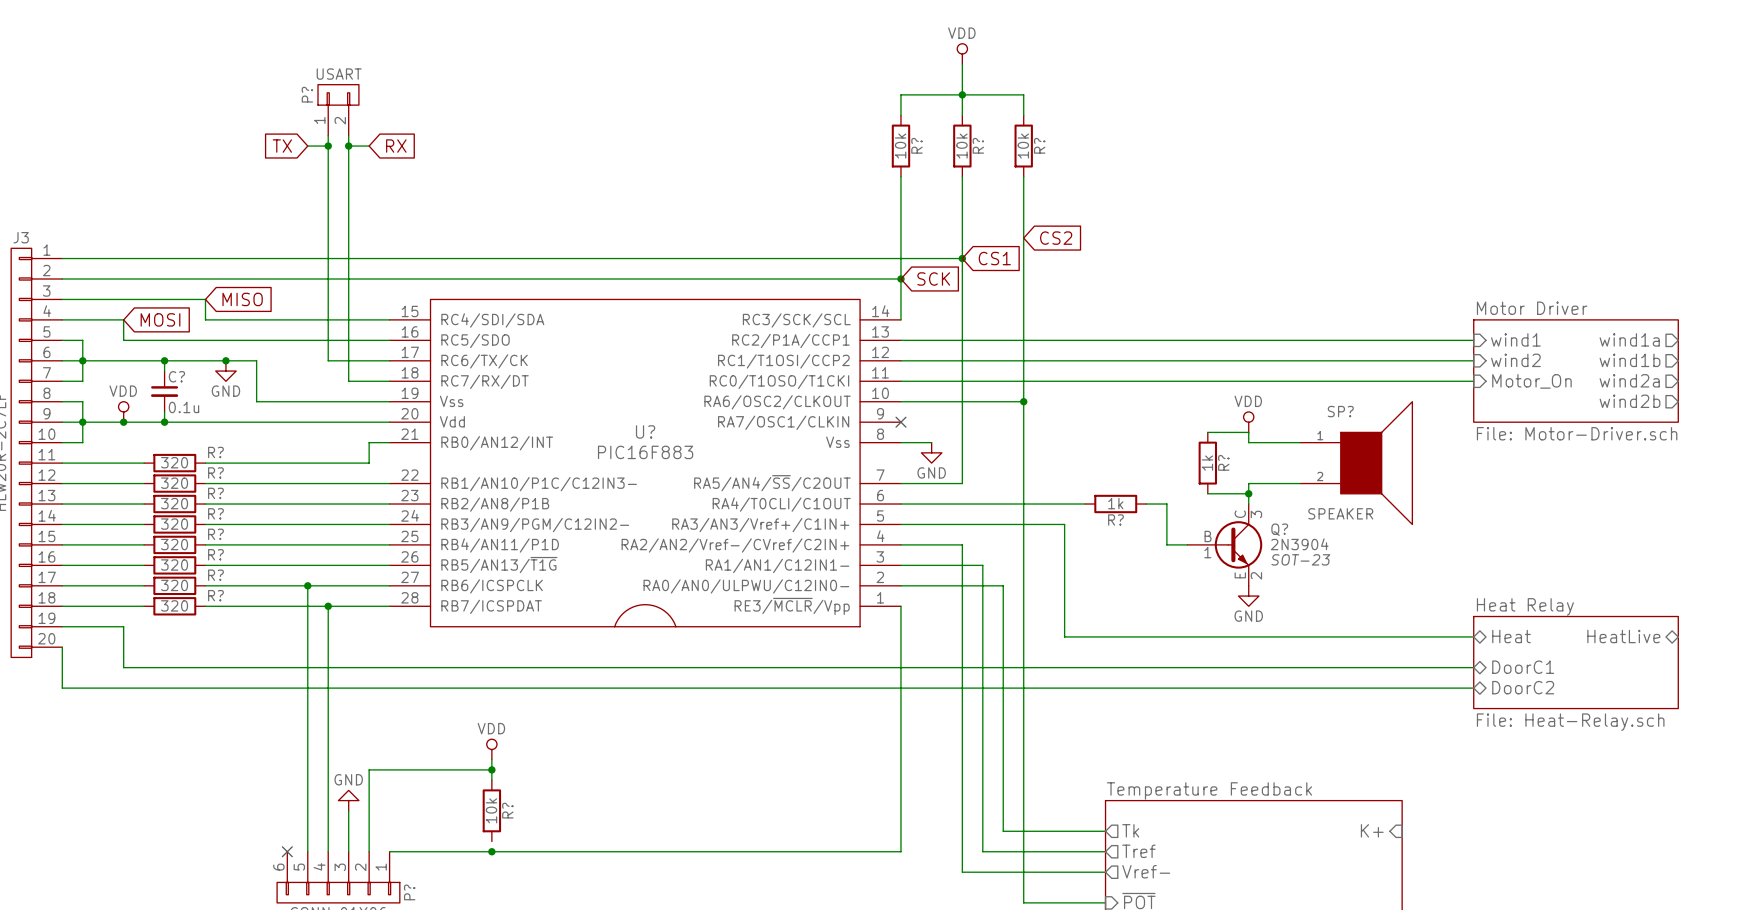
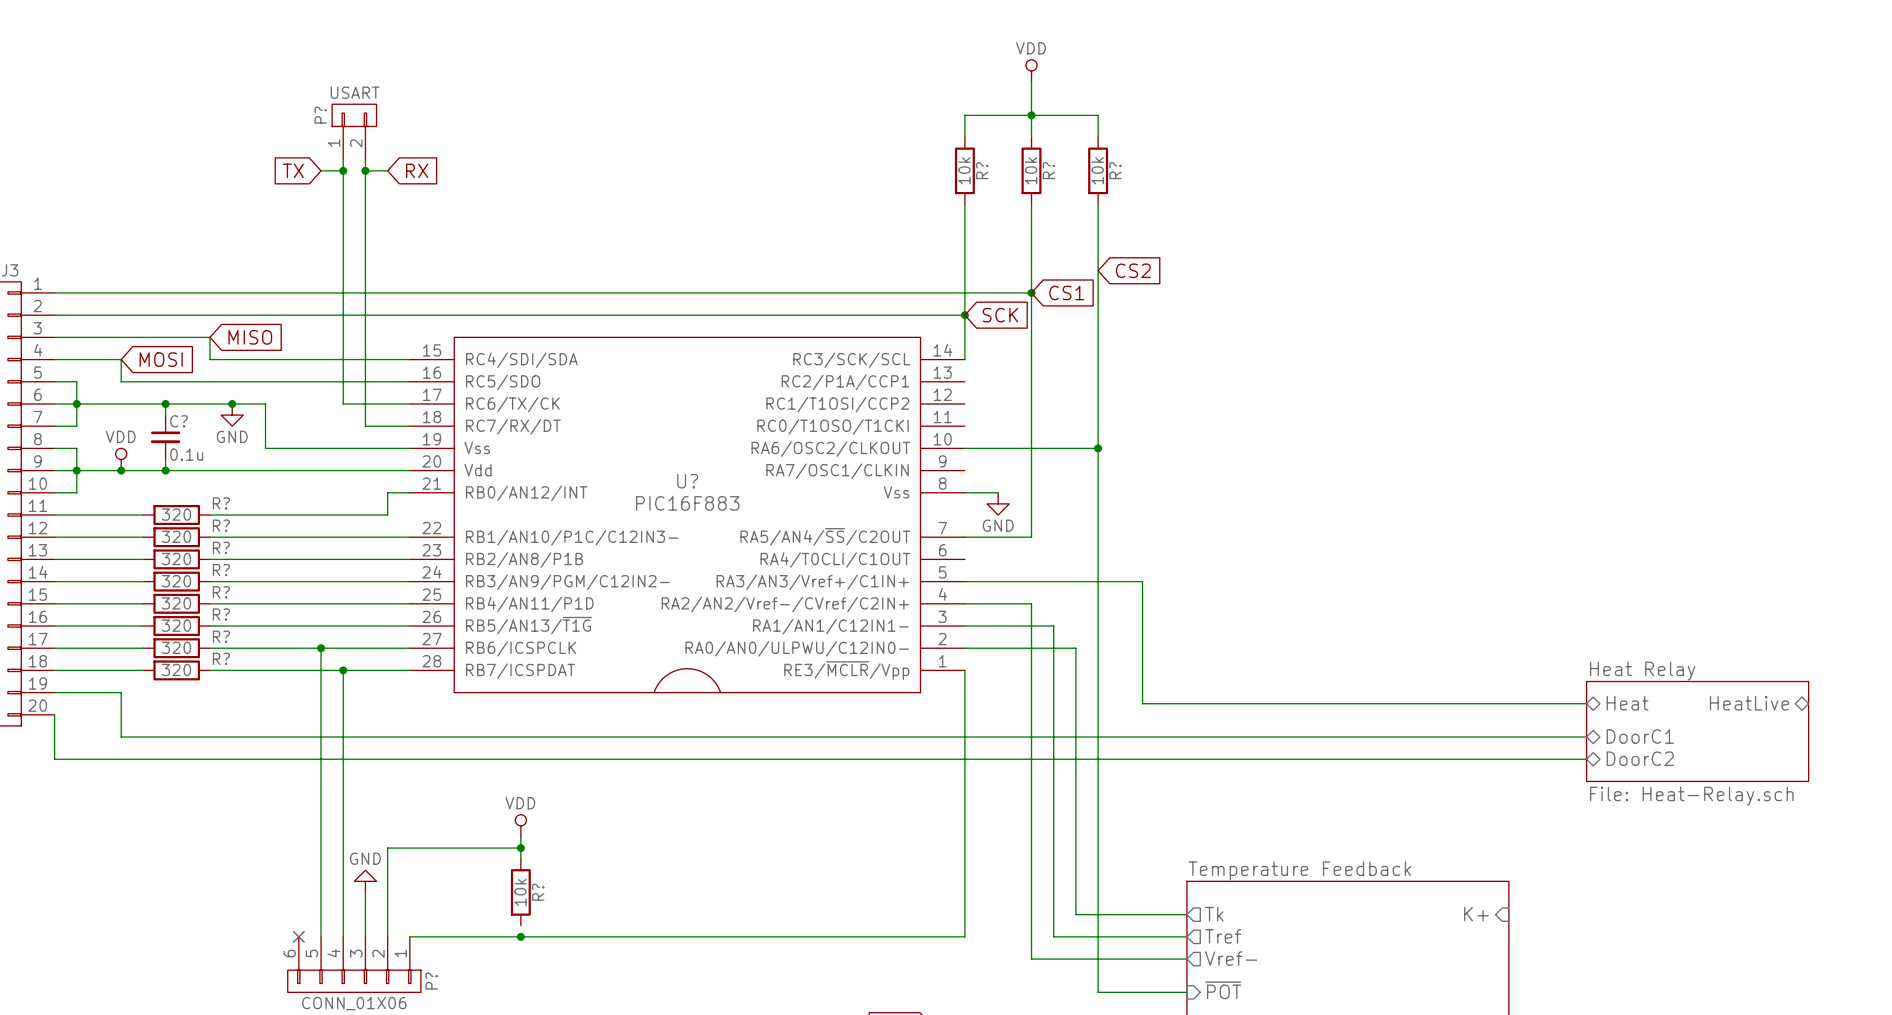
sheet pin: wind1 (1515, 339) -> none
sheet pin: wind1a (1629, 339) -> none
wire: (900, 340) (1473, 340) -> none
wire: (900, 360) (1473, 360) -> none
sheet pin: wind2 (1515, 360) -> none
sheet pin: wind1b (1629, 360) -> none
sheet Motor Driver: File: Motor-Driver.sch (1576, 371) -> none
sheet pin: wind2a (1629, 380) -> none
wire: (900, 381) (1473, 381) -> none
sheet pin: Motor_On (1531, 381) -> none
sheet pin: wind2b (1629, 401) -> none
no-connect mark: (900, 422) -> none
power symbol: VDD (1248, 422) -> none
wire: (1207, 432) (1248, 432) (1248, 442) (1299, 442) -> none
R?: 1k (1207, 463) -> none
SP?: SPEAKER (1356, 463) -> none
wire: (1299, 483) (1248, 483) (1248, 504) -> none
wire: (1207, 493) (1248, 493) -> none
junction: (1248, 493) -> none
wire: (900, 504) (1085, 504) -> none
R?: 1k (1115, 504) -> none
wire: (1146, 504) (1166, 504) (1166, 544) (1187, 544) -> none
Q?: 2N3904 (1224, 544) -> none
power symbol: GND (1248, 596) -> none

